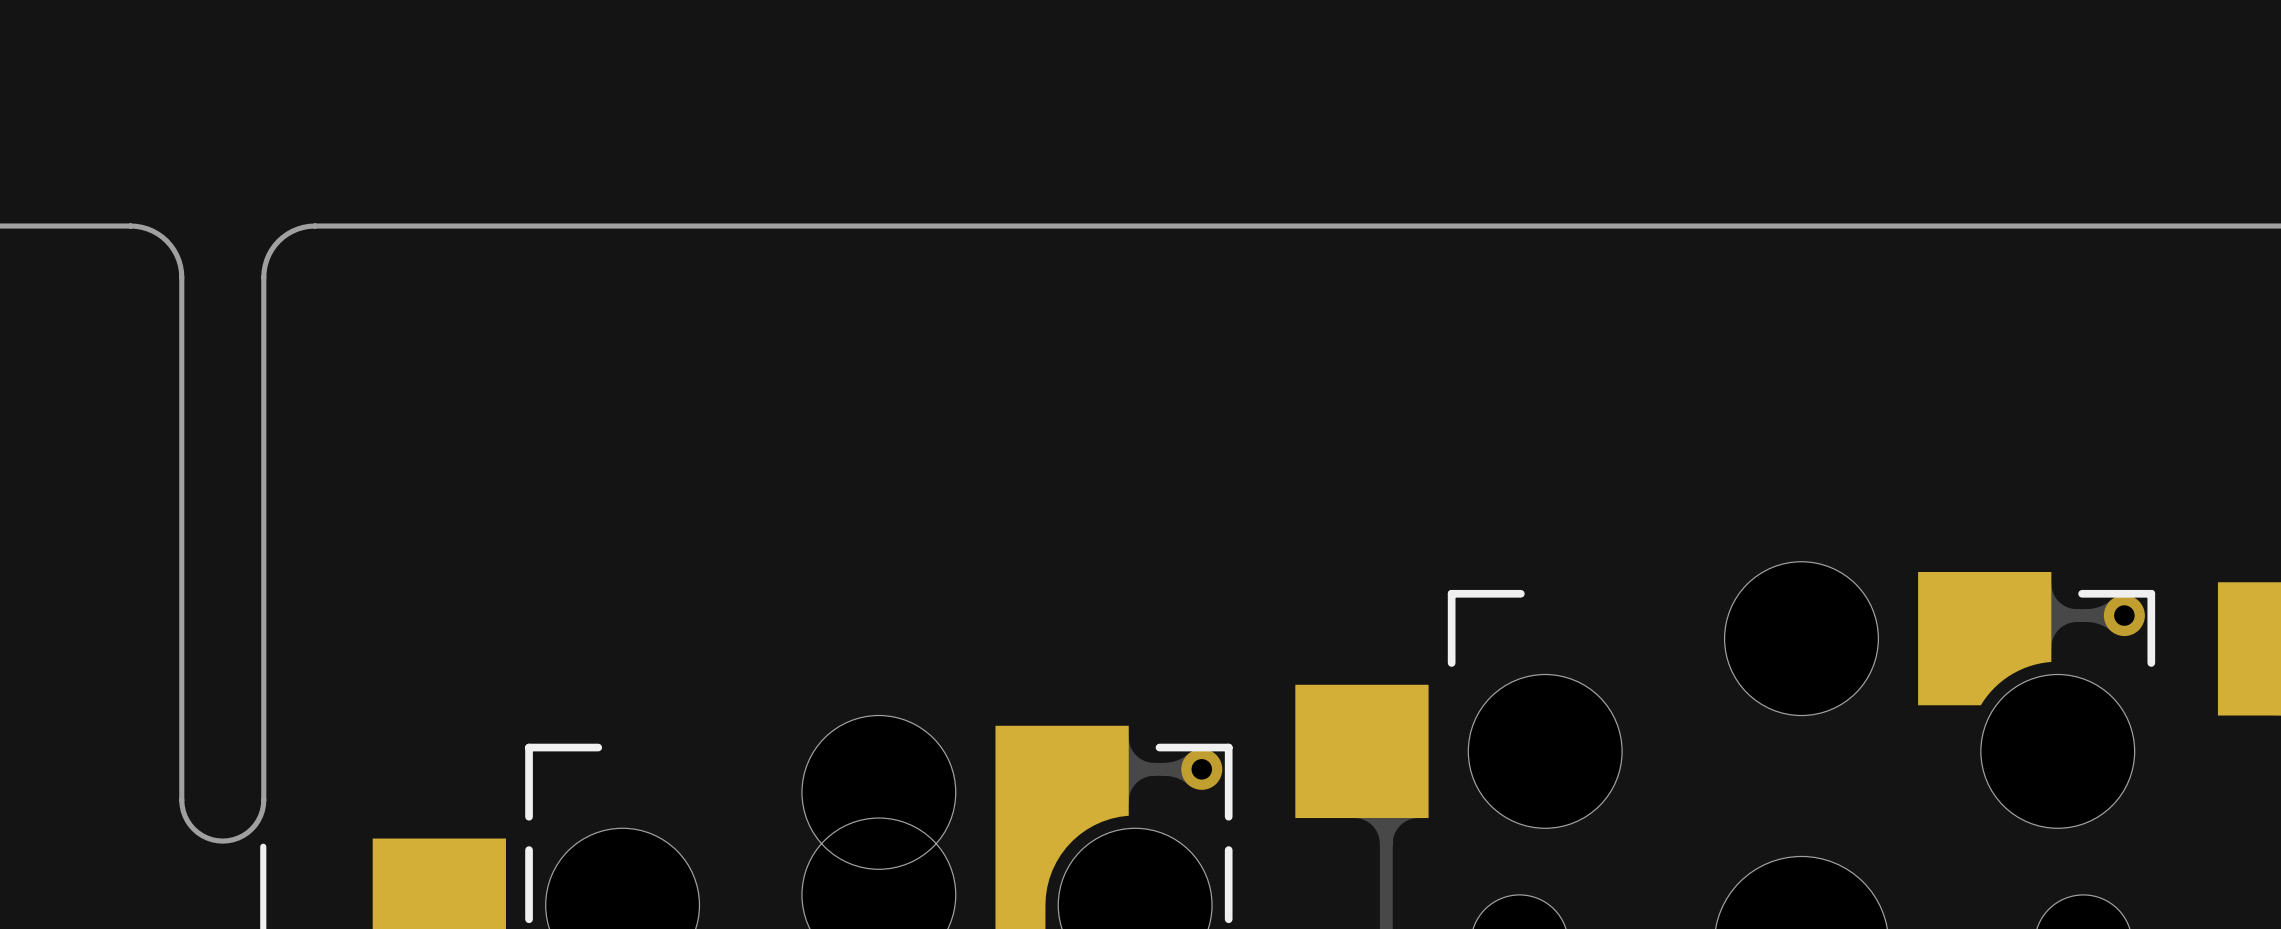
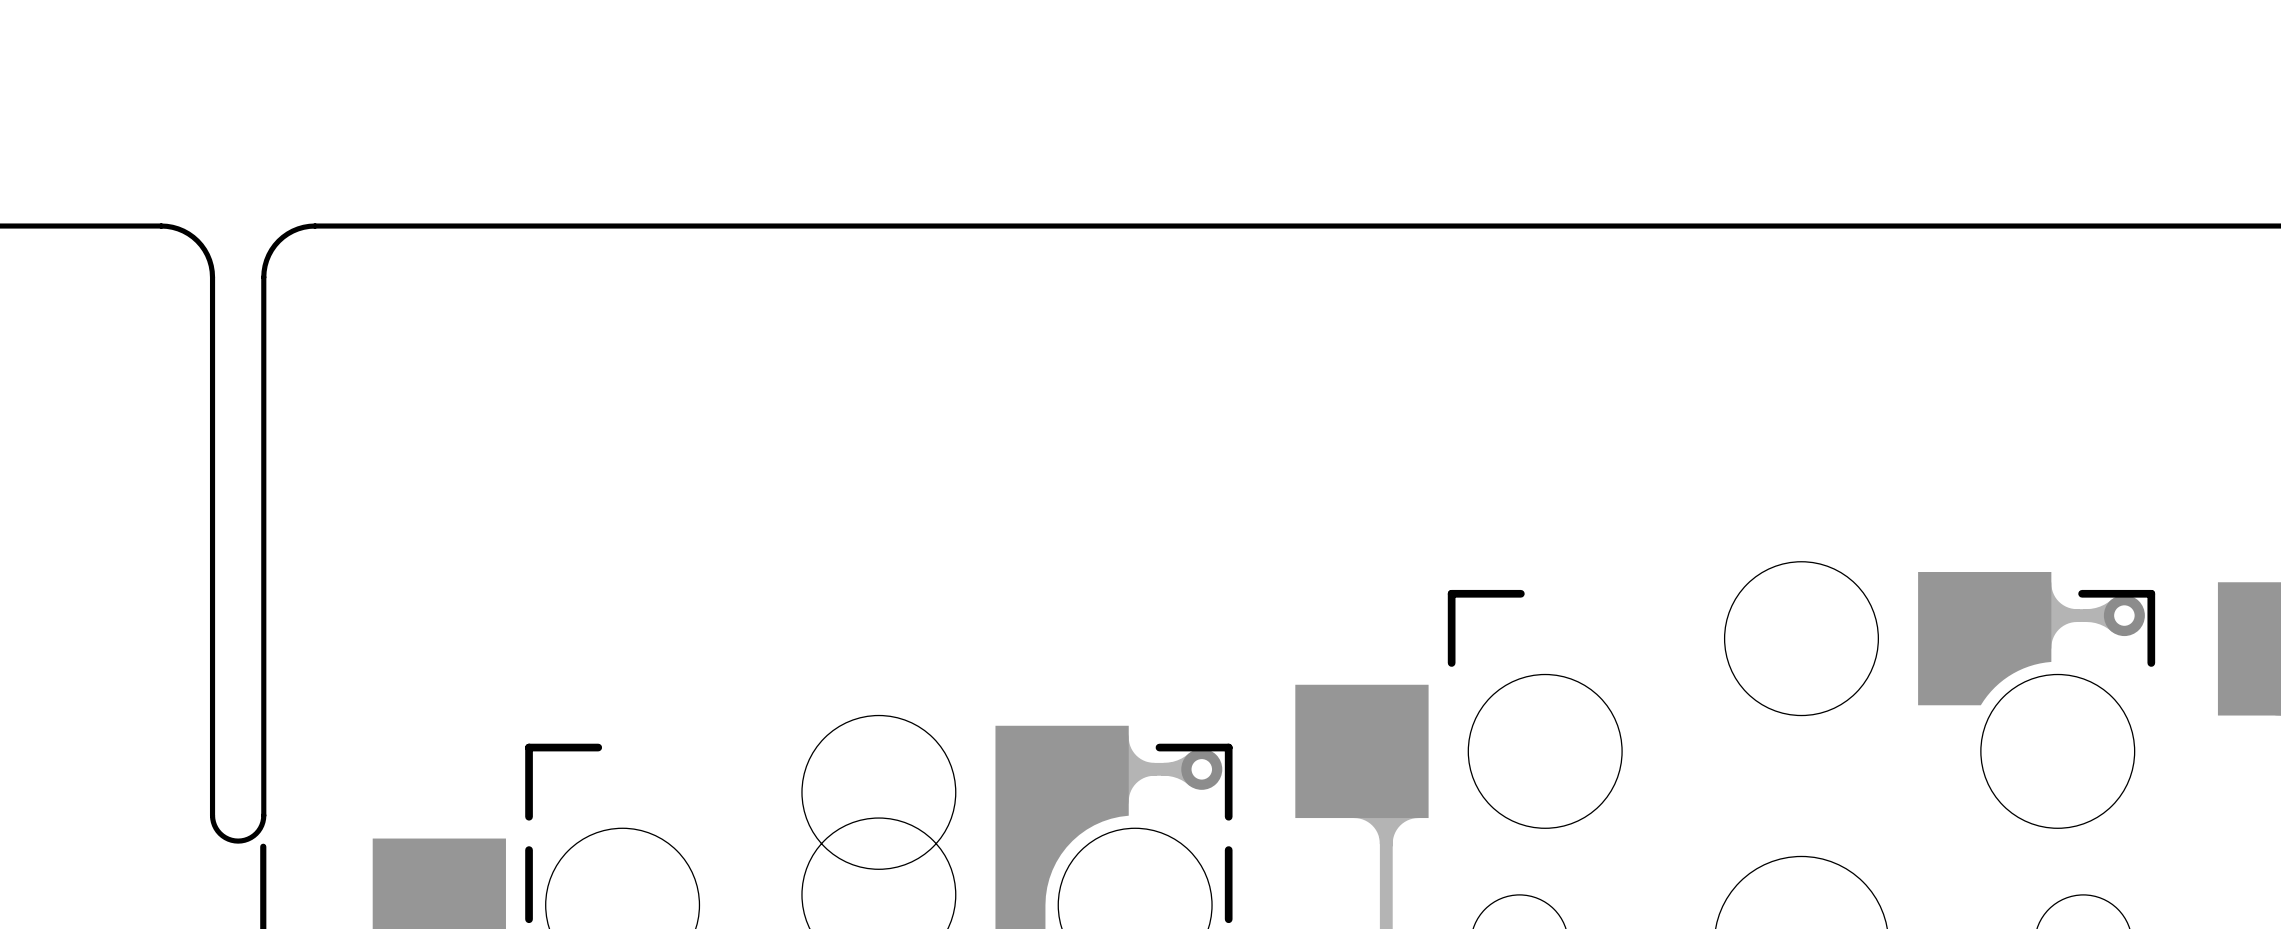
board edge: (130, 226) (152, 231) (166, 241) (176, 255) (181, 271) (183, 810) (190, 825) (197, 832) (212, 839) (228, 840) (243, 835) (255, 825) (262, 810) (263, 800) -> (130, 226) (167, 226) (183, 231) (201, 245) (211, 265) (212, 815) (215, 828) (222, 835) (231, 840) (241, 840) (250, 837) (261, 825) (263, 800)

